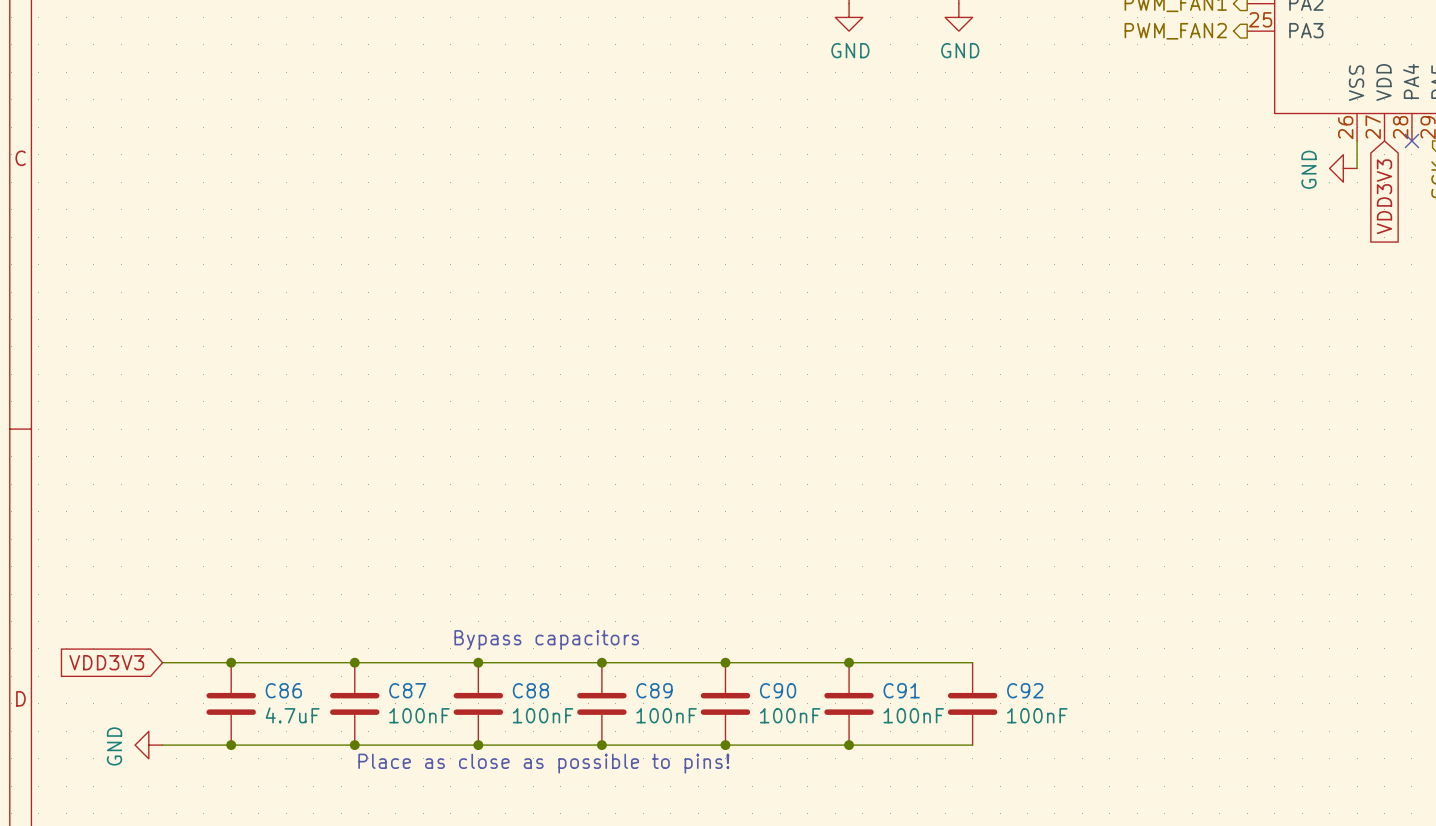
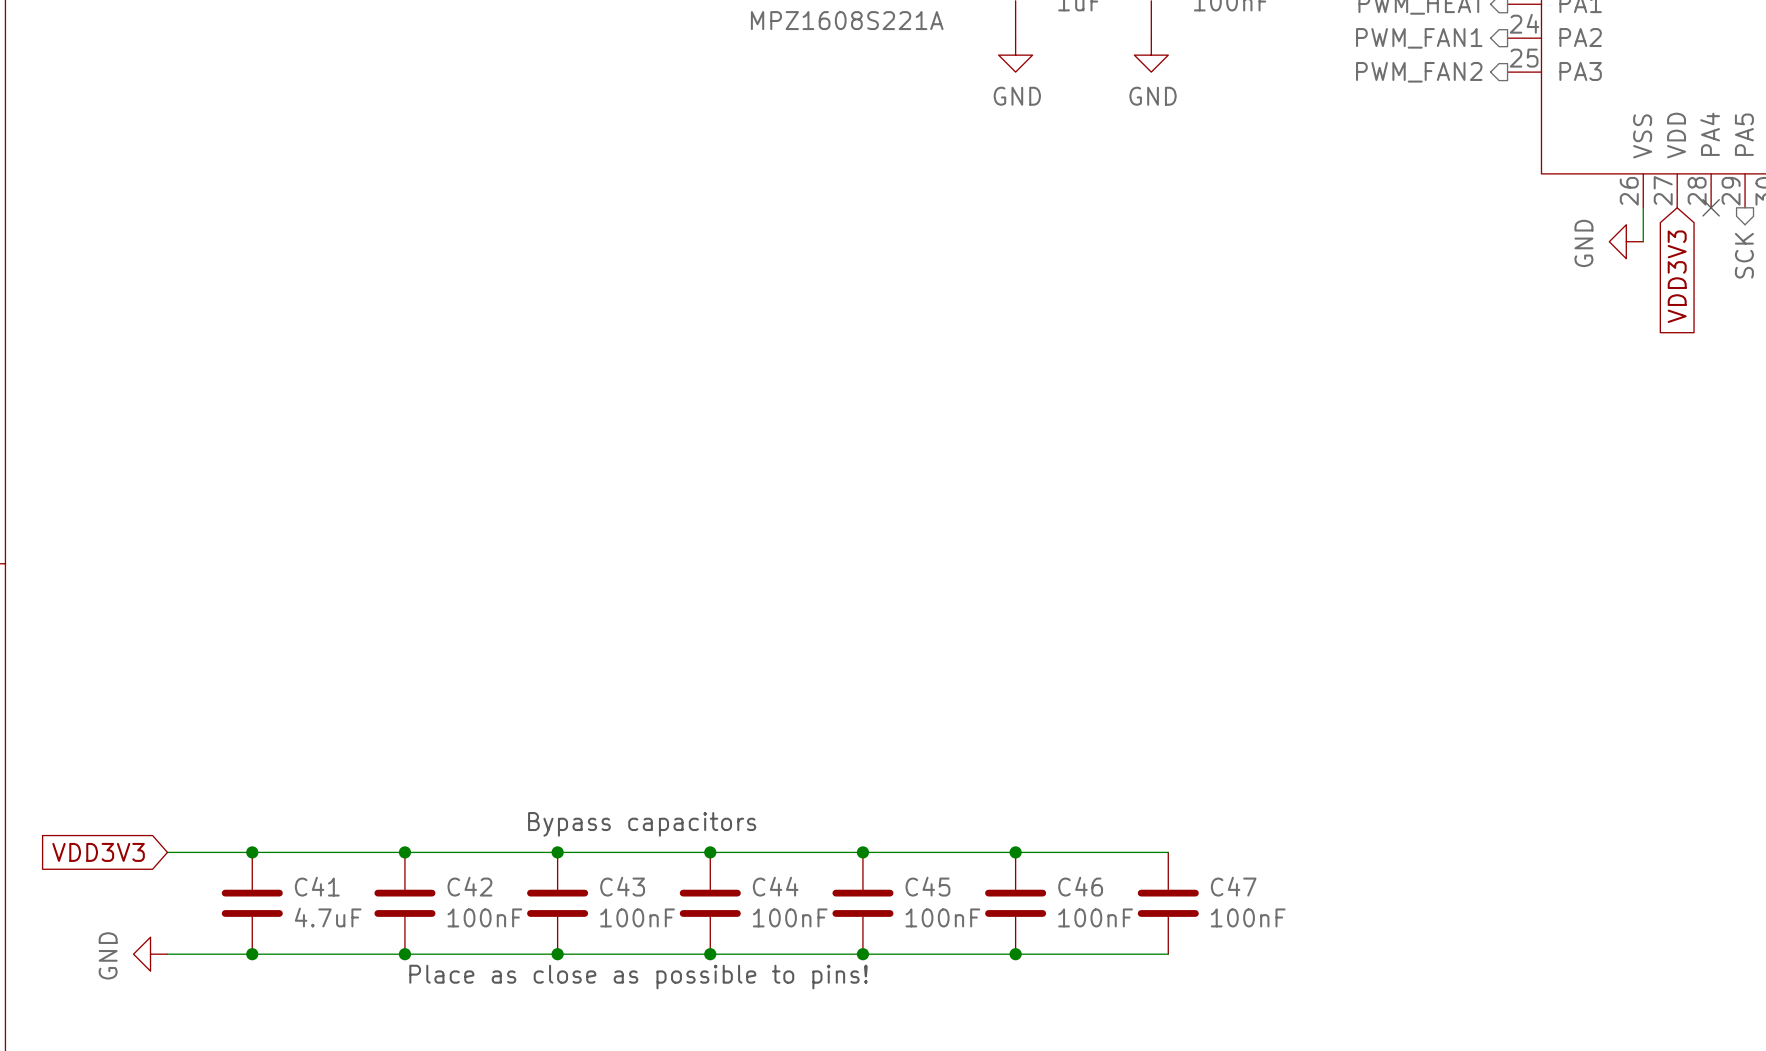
C86 name: C86 (283, 690) -> C41 (317, 886)
C87 name: C87 (407, 690) -> C42 (469, 886)
C88 name: C88 (530, 690) -> C43 (622, 886)
C89 name: C89 (654, 690) -> C44 (775, 886)
C90 name: C90 (778, 690) -> C45 (927, 886)
C91 name: C91 (901, 690) -> C46 (1080, 886)
C92 name: C92 (1025, 690) -> C47 (1233, 886)

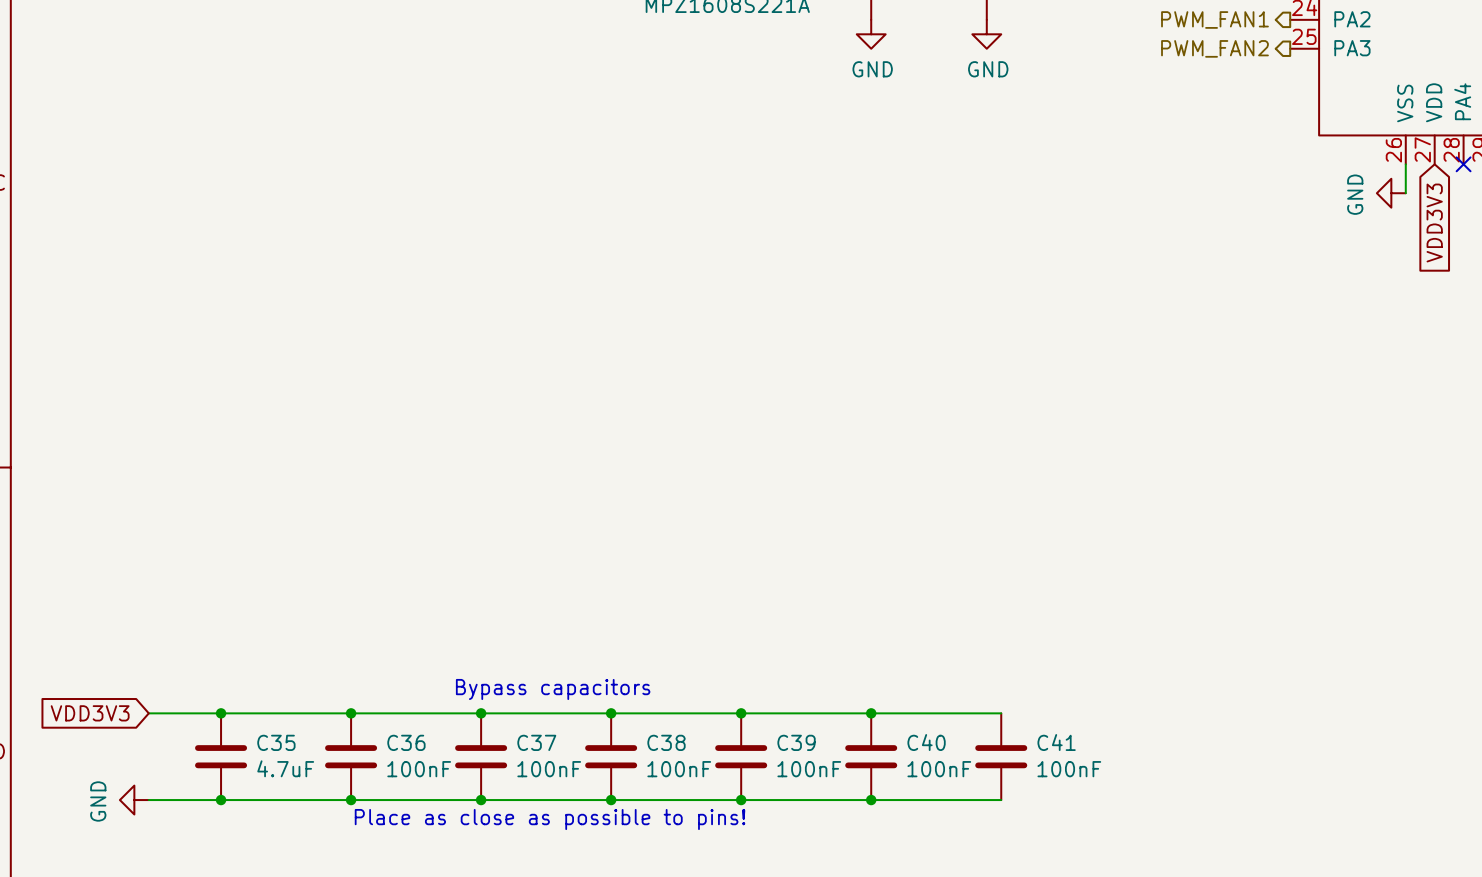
C41 name: C41 (317, 886) -> C35 (276, 742)
C42 name: C42 (469, 886) -> C36 (406, 742)
C43 name: C43 (622, 886) -> C37 (536, 742)
C44 name: C44 (775, 886) -> C38 (666, 742)
C45 name: C45 (927, 886) -> C39 (796, 742)
C46 name: C46 (1080, 886) -> C40 (926, 742)
C47 name: C47 (1233, 886) -> C41 (1056, 742)

